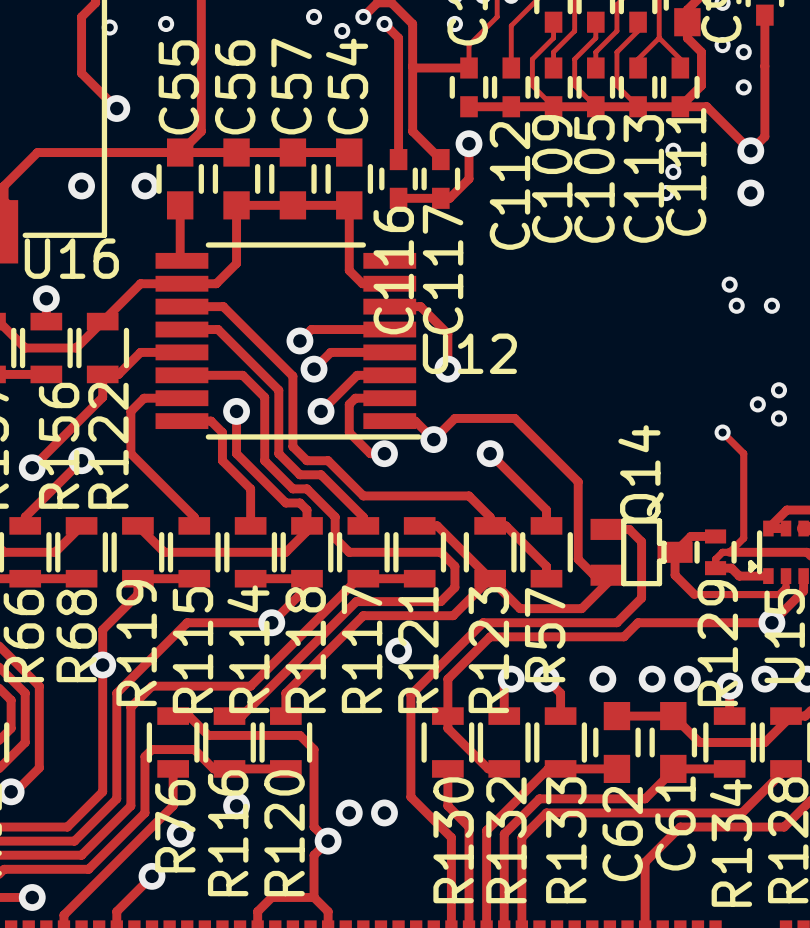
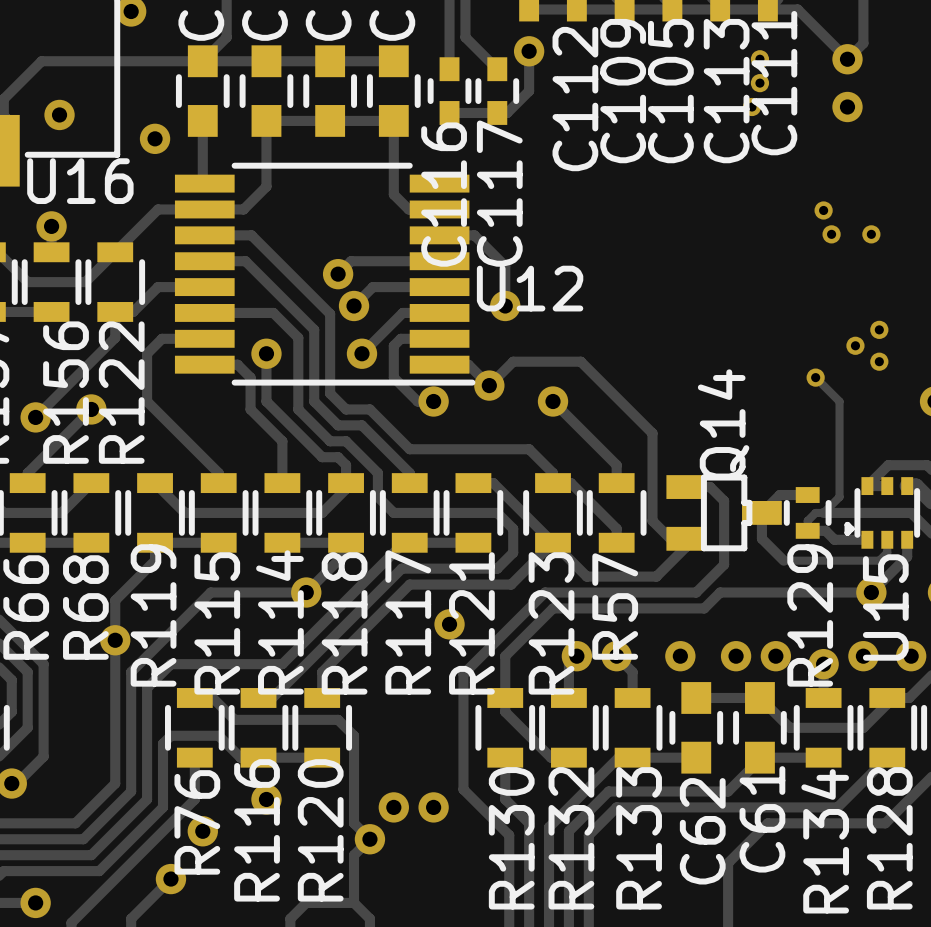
via position: (81, 185) -> (59, 114)
via: (144, 185) -> none
via: none -> (155, 138)

